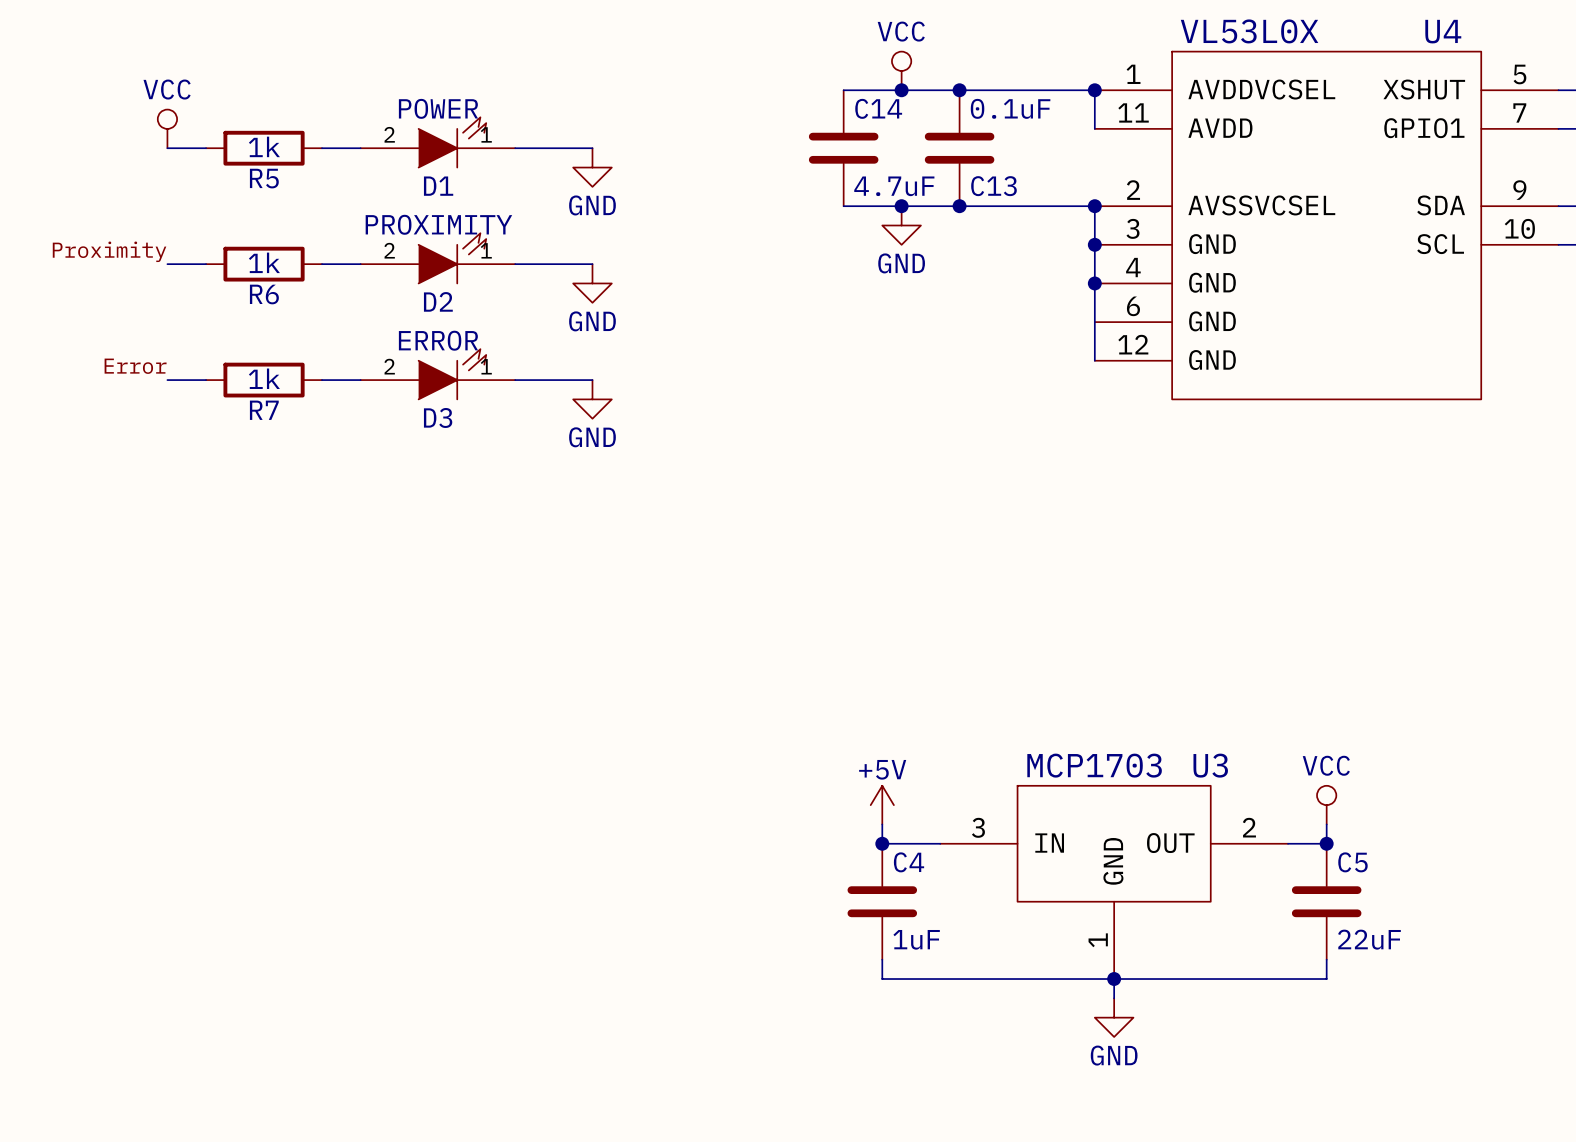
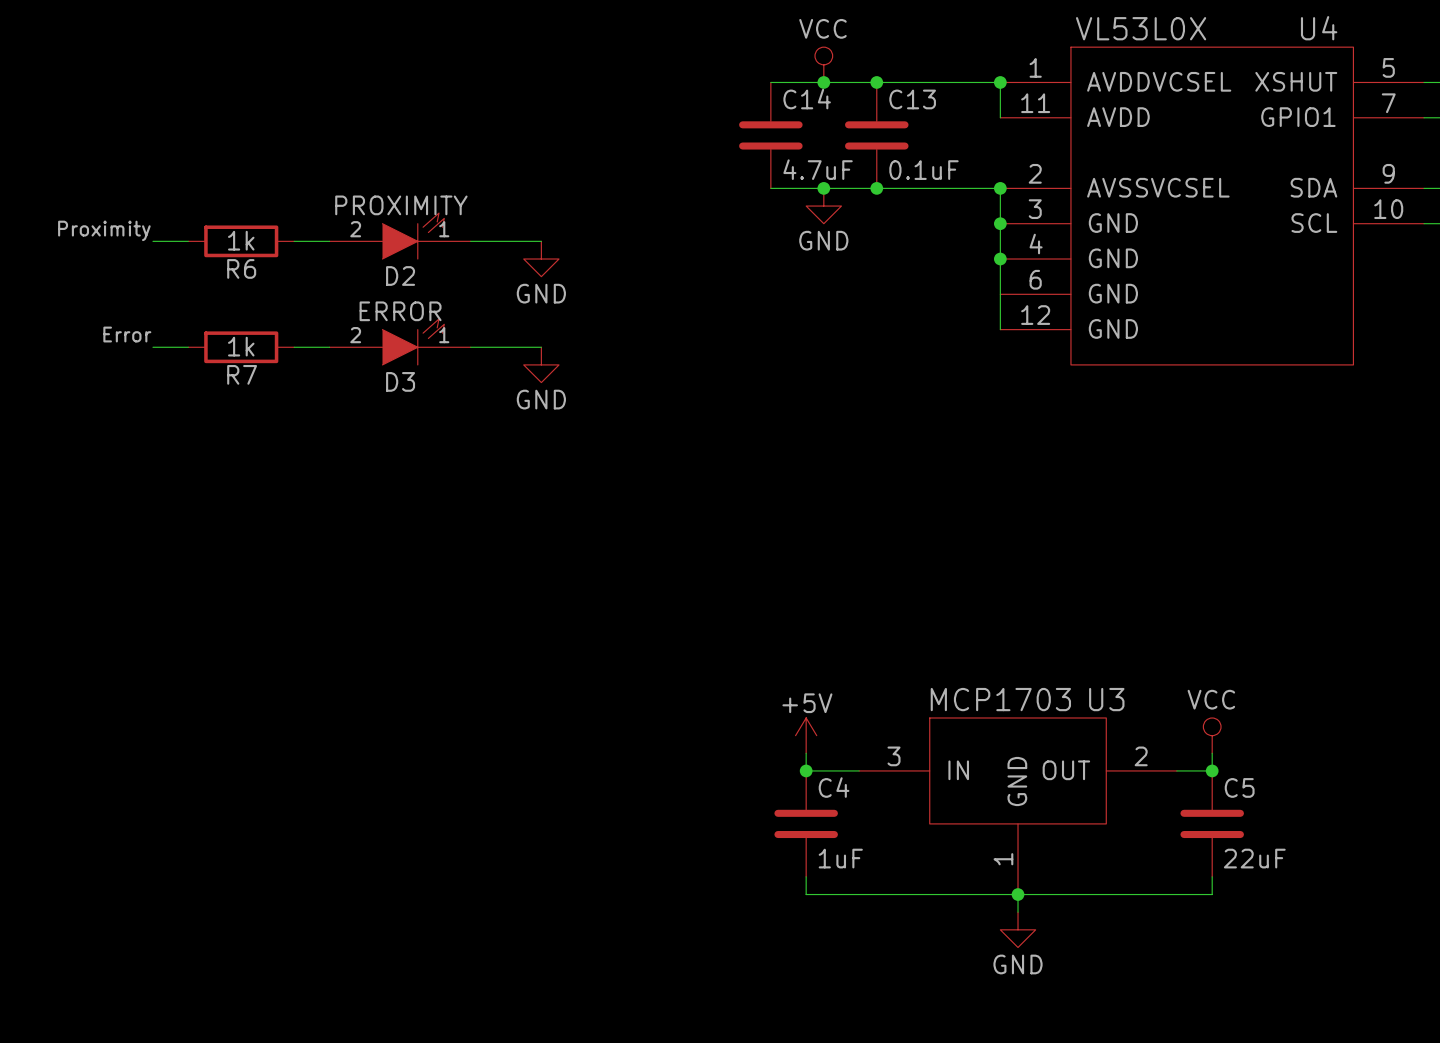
C13 value position: 0.1uF (1010, 108) -> 0.1uF (923, 170)
power symbol: VCC (167, 128) -> none
D1: POWER (437, 142) -> none
wire: (167, 148) (206, 148) -> none
R5: 1k (264, 148) -> none
wire: (322, 148) (360, 148) -> none
wire: (515, 148) (592, 148) -> none
power symbol: GND (592, 167) -> none
C13 name position: C13 (993, 186) -> C13 (912, 99)

